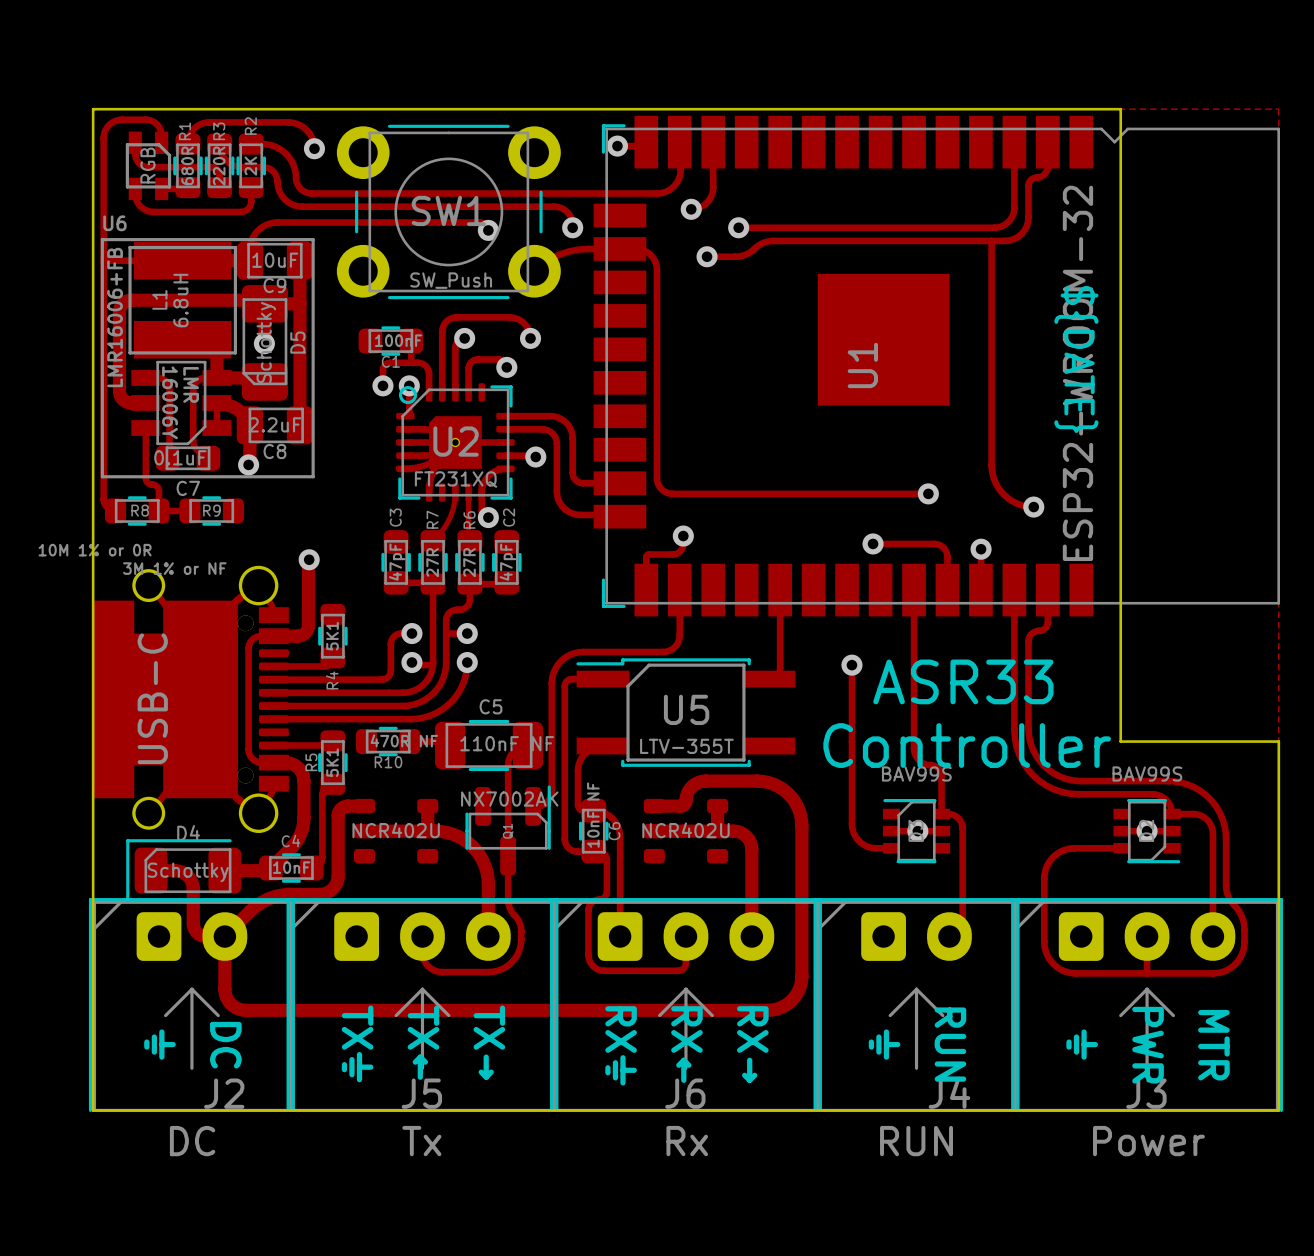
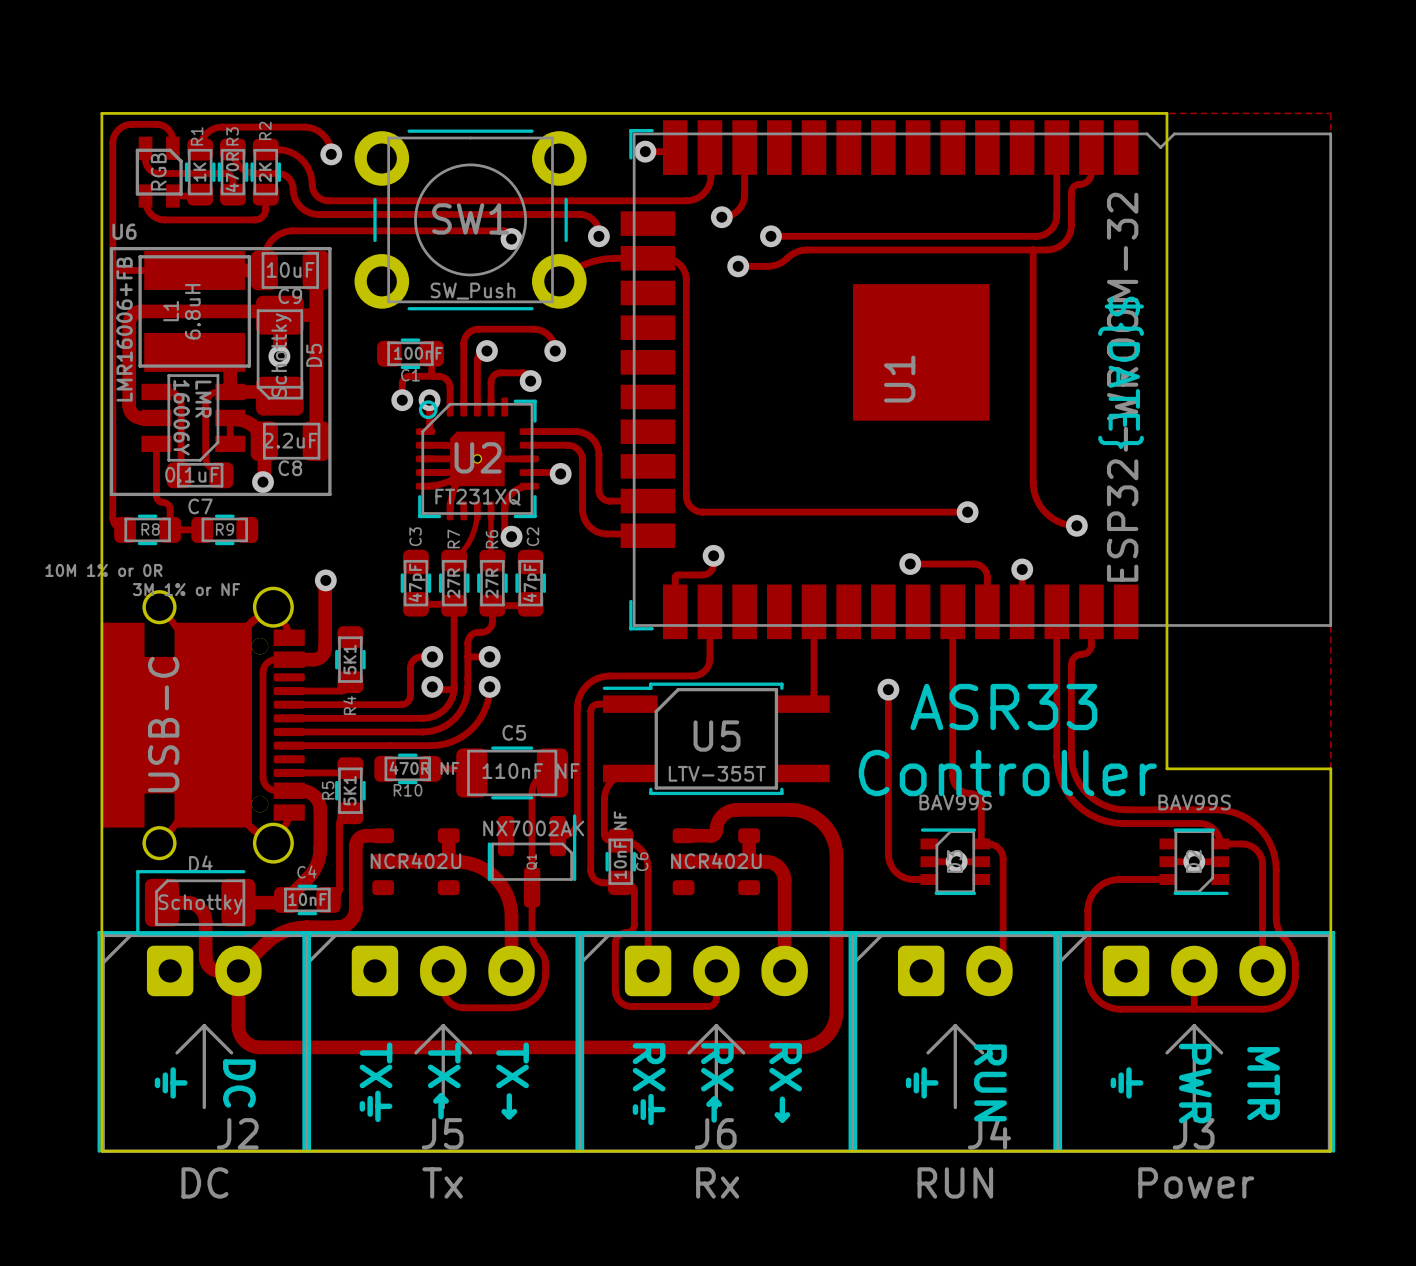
R1 value: 680R (187, 165) -> 1K (199, 172)
R3 value: 220R (219, 166) -> 470R (232, 172)

